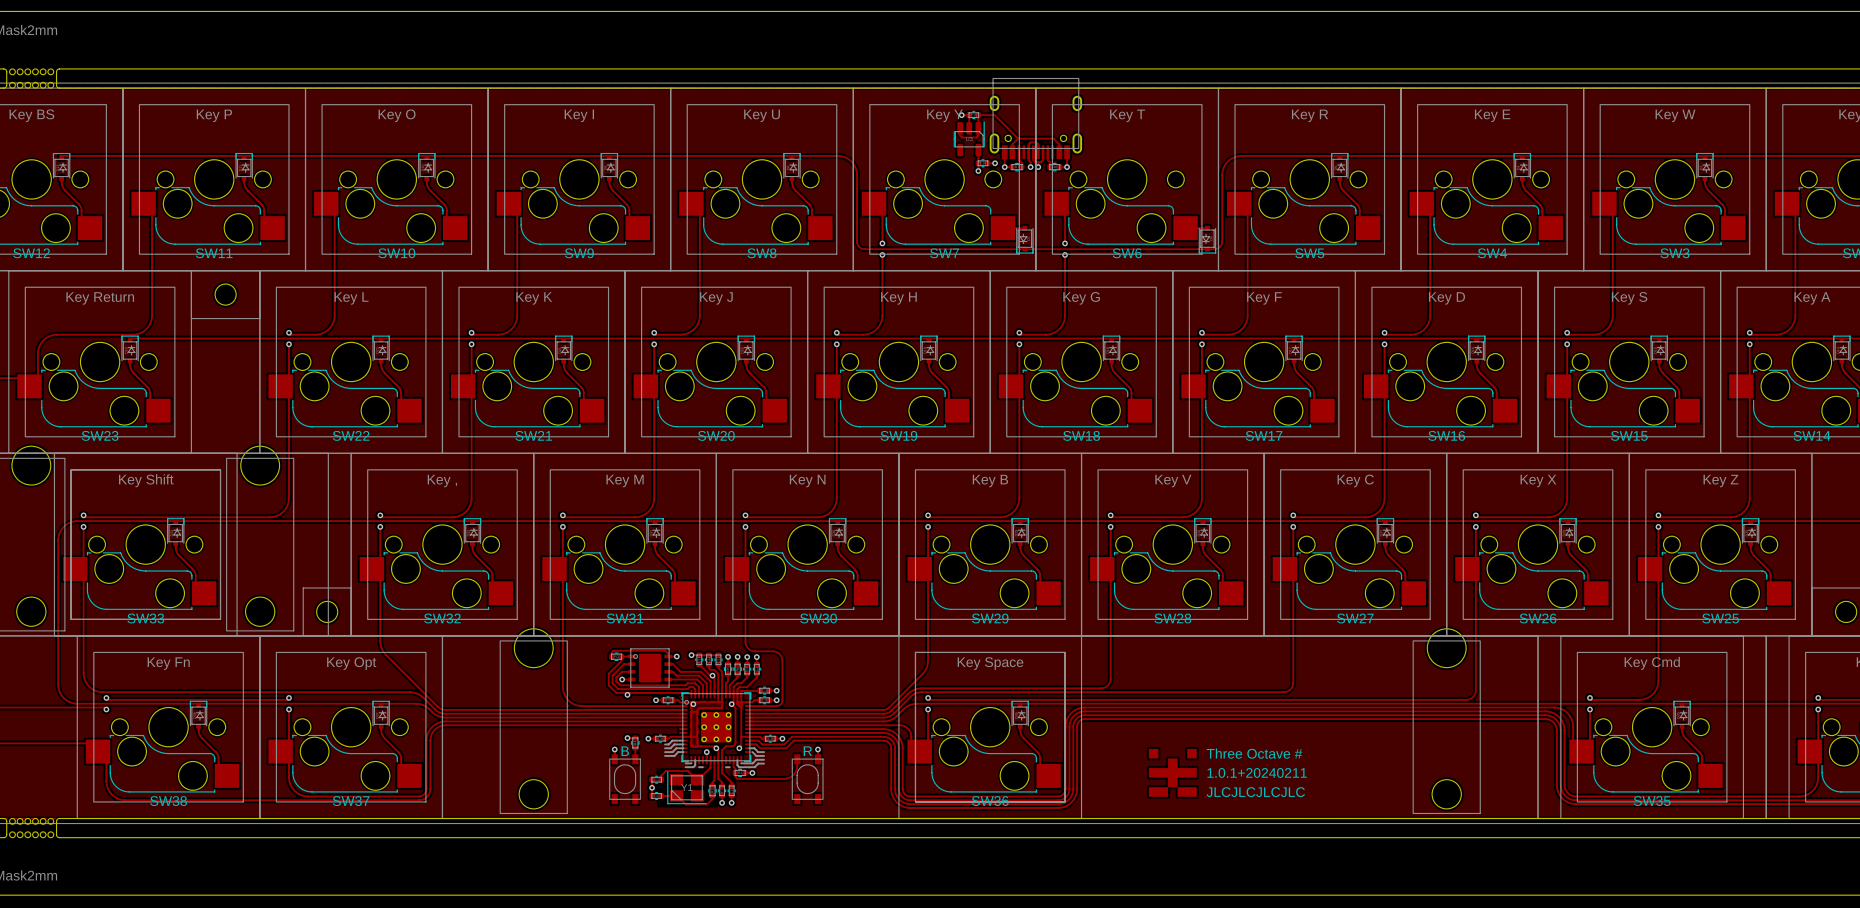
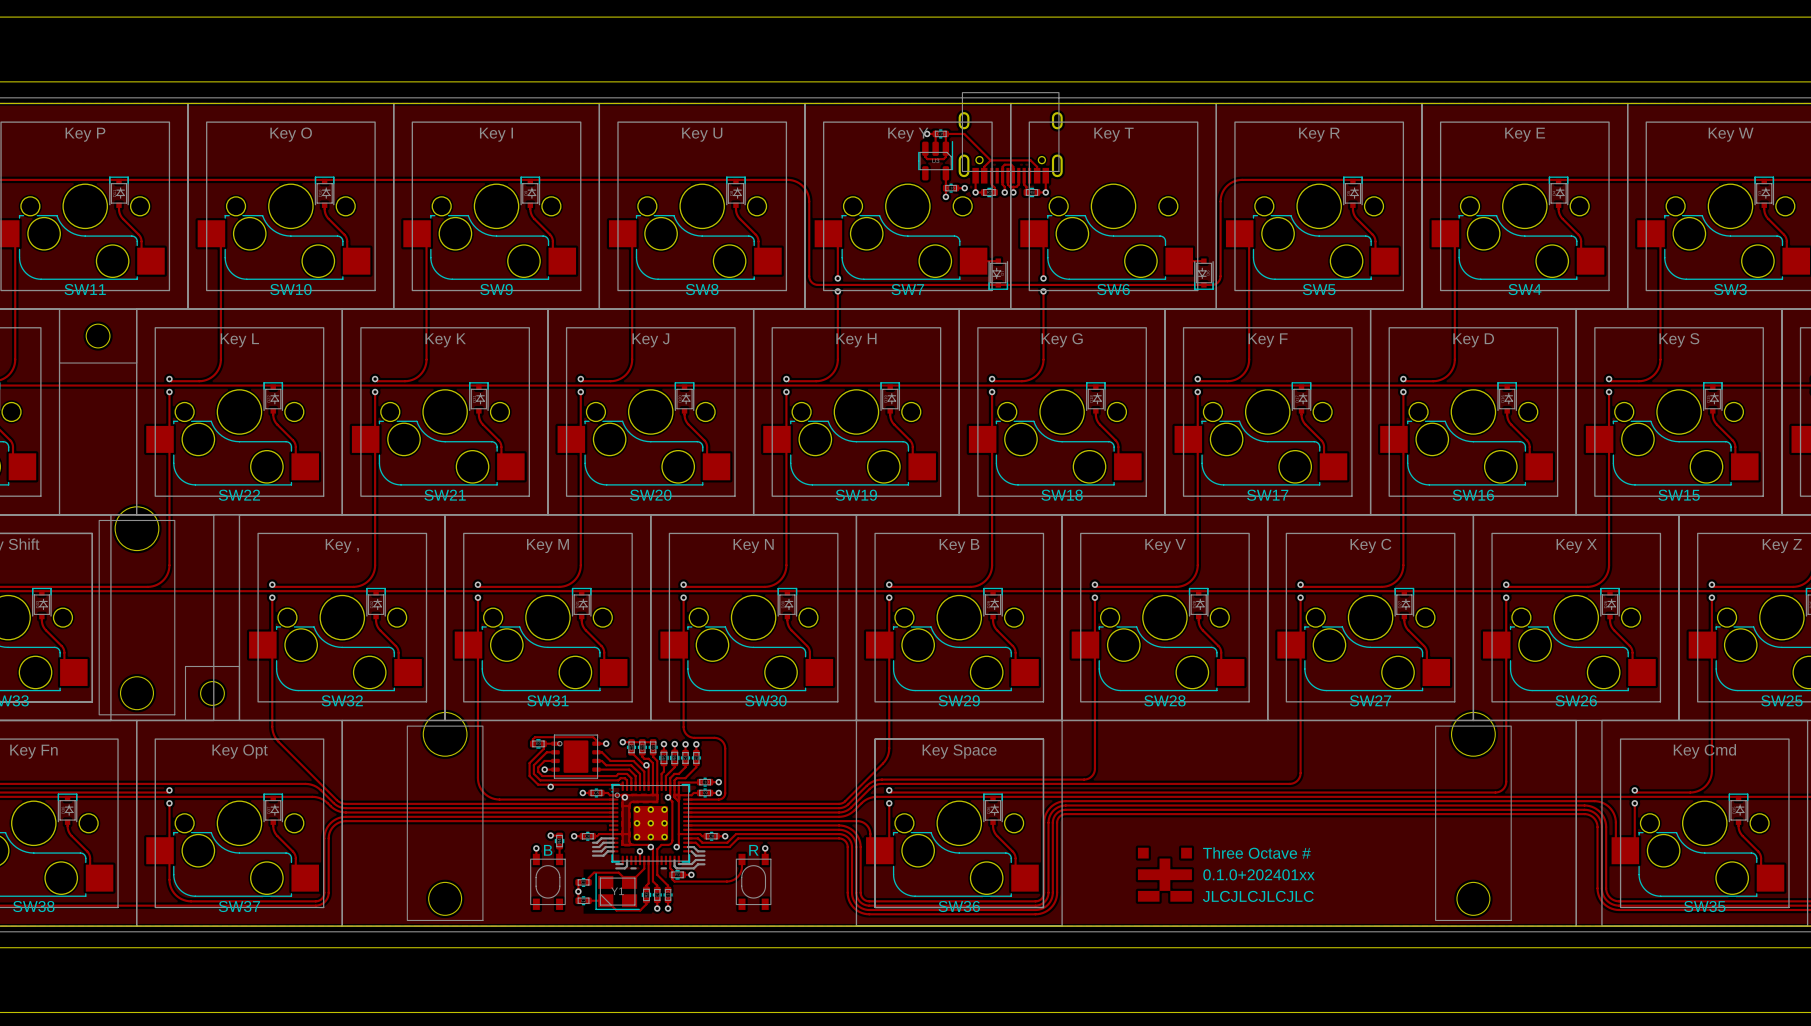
text: 1.0.1+20240211 (1257, 772) -> 0.1.0+202401xx (1258, 874)

